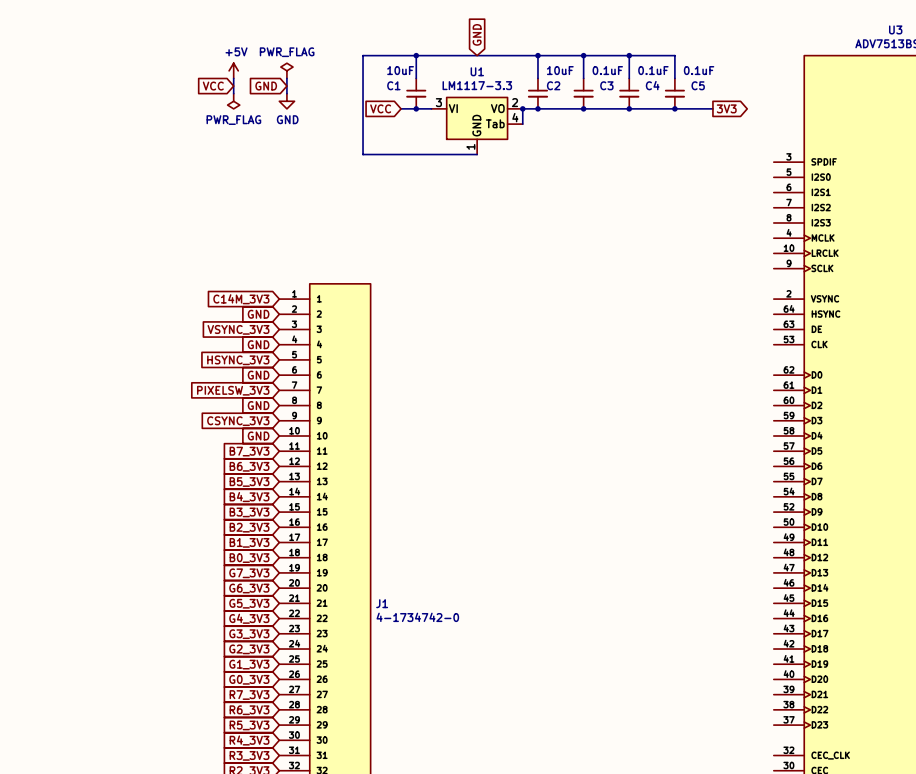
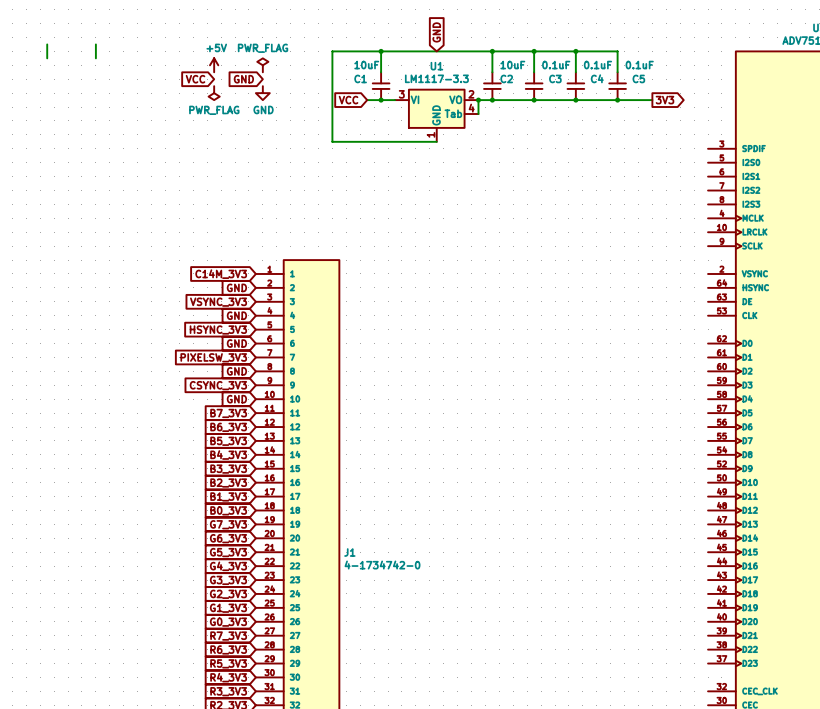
wire: none -> (47, 44) (47, 58)
wire: (233, 78) (233, 93) -> (95, 44) (95, 58)
wire: (286, 78) (286, 93) -> none

